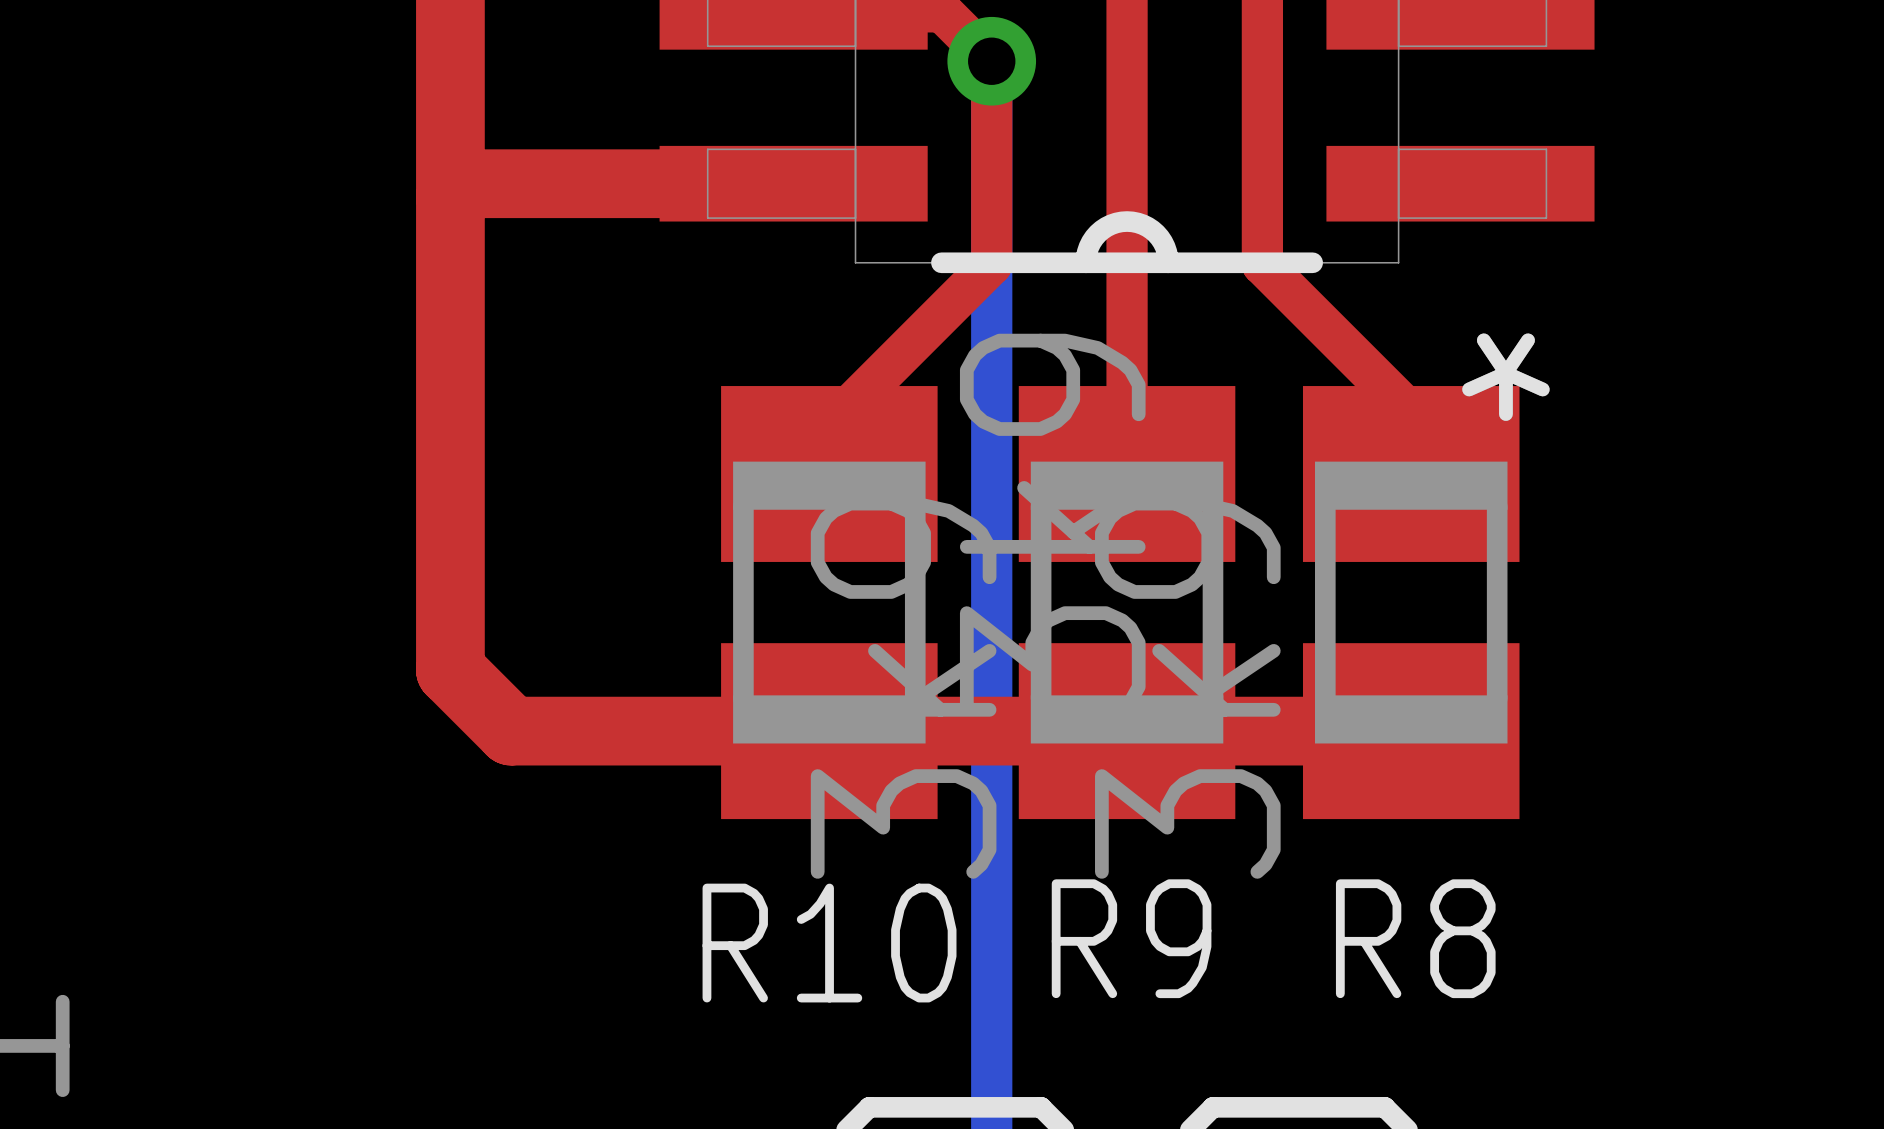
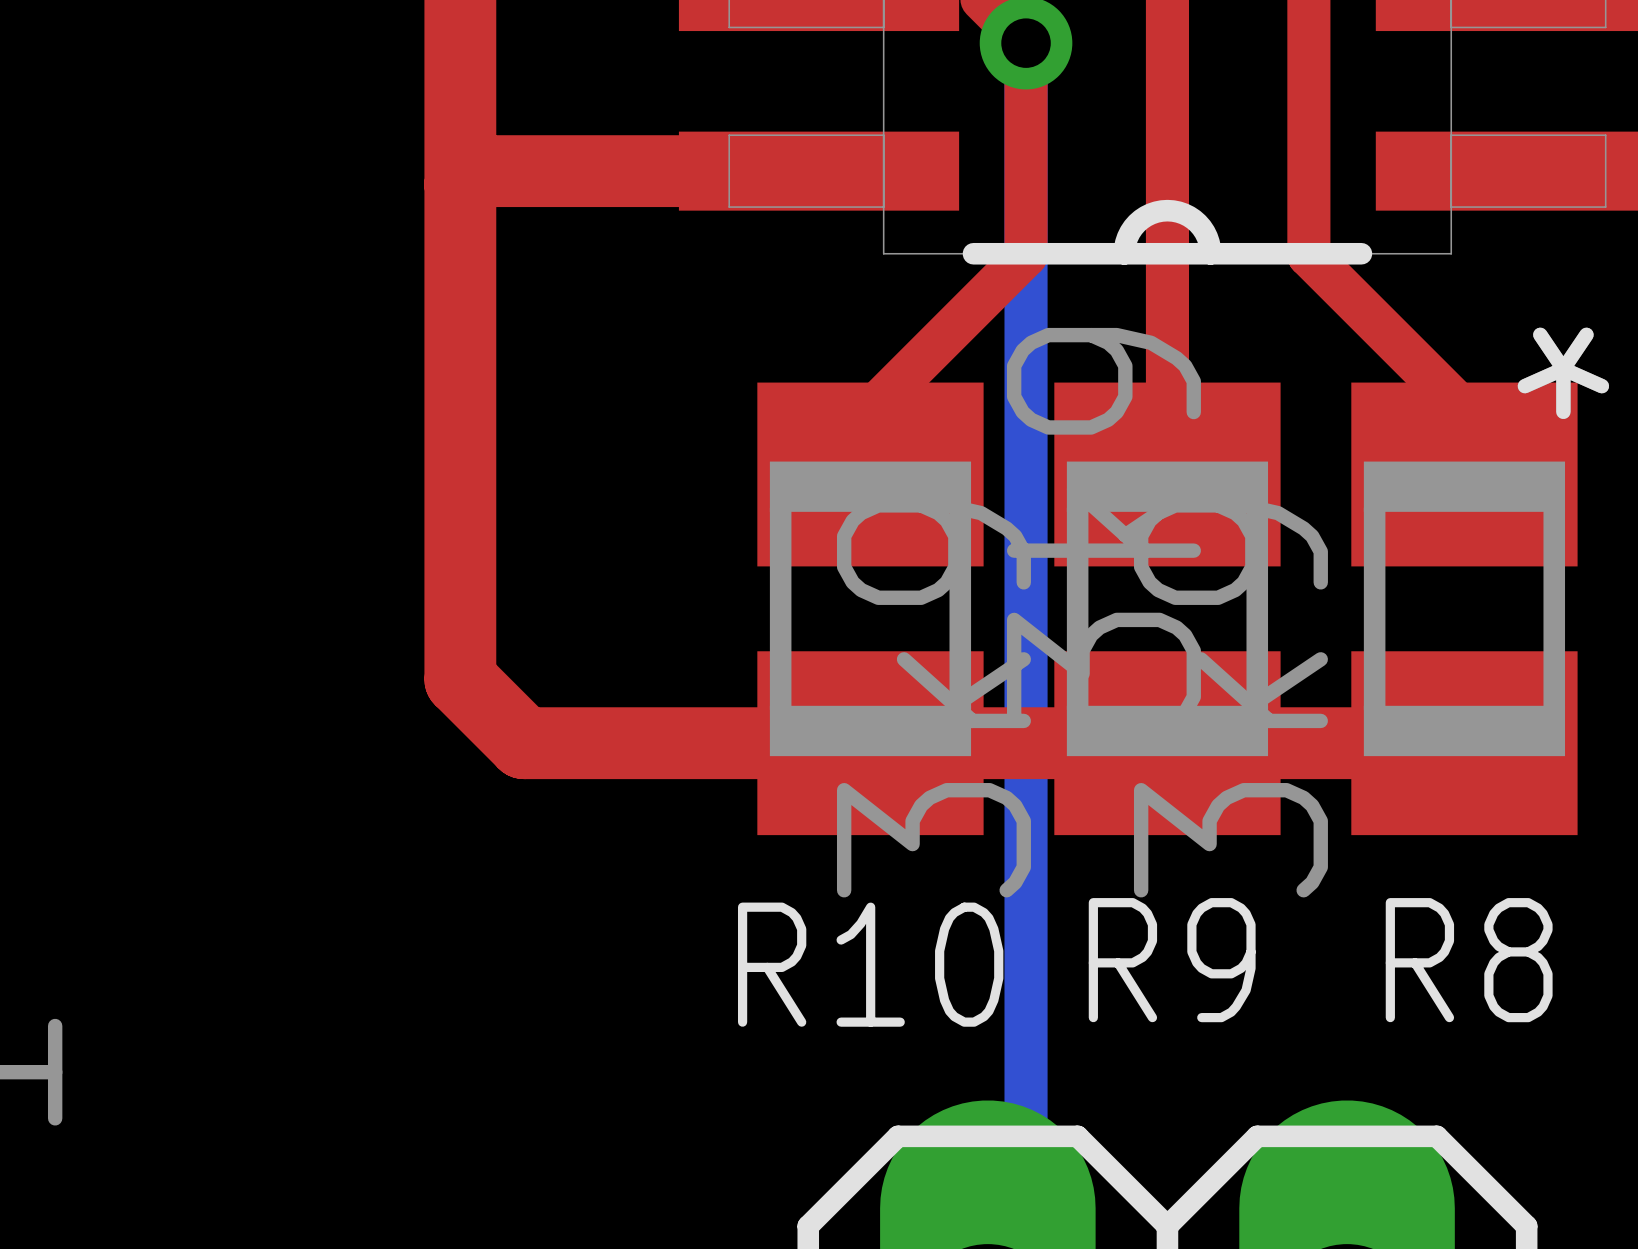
R10 position: (829, 602) -> (870, 608)

